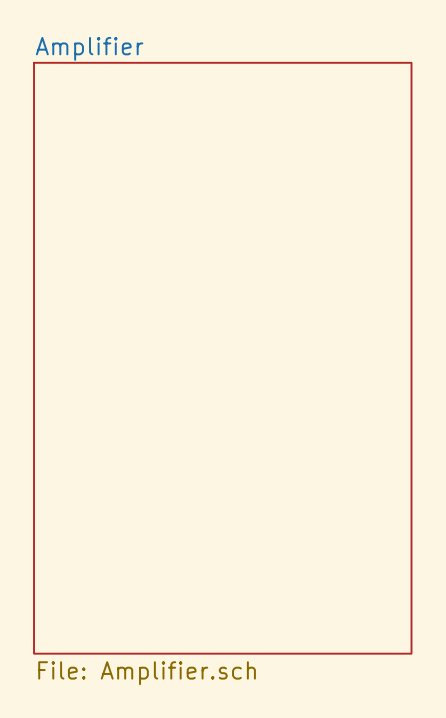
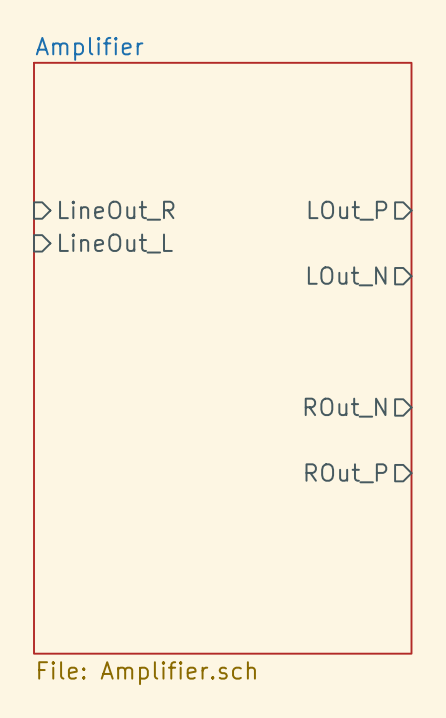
sheet pin: none -> LineOut_R (116, 210)
sheet pin: none -> LOut_P (347, 210)
sheet pin: none -> LineOut_L (115, 243)
sheet pin: none -> LOut_N (347, 276)
sheet pin: none -> ROut_N (345, 407)
sheet pin: none -> ROut_P (346, 473)

